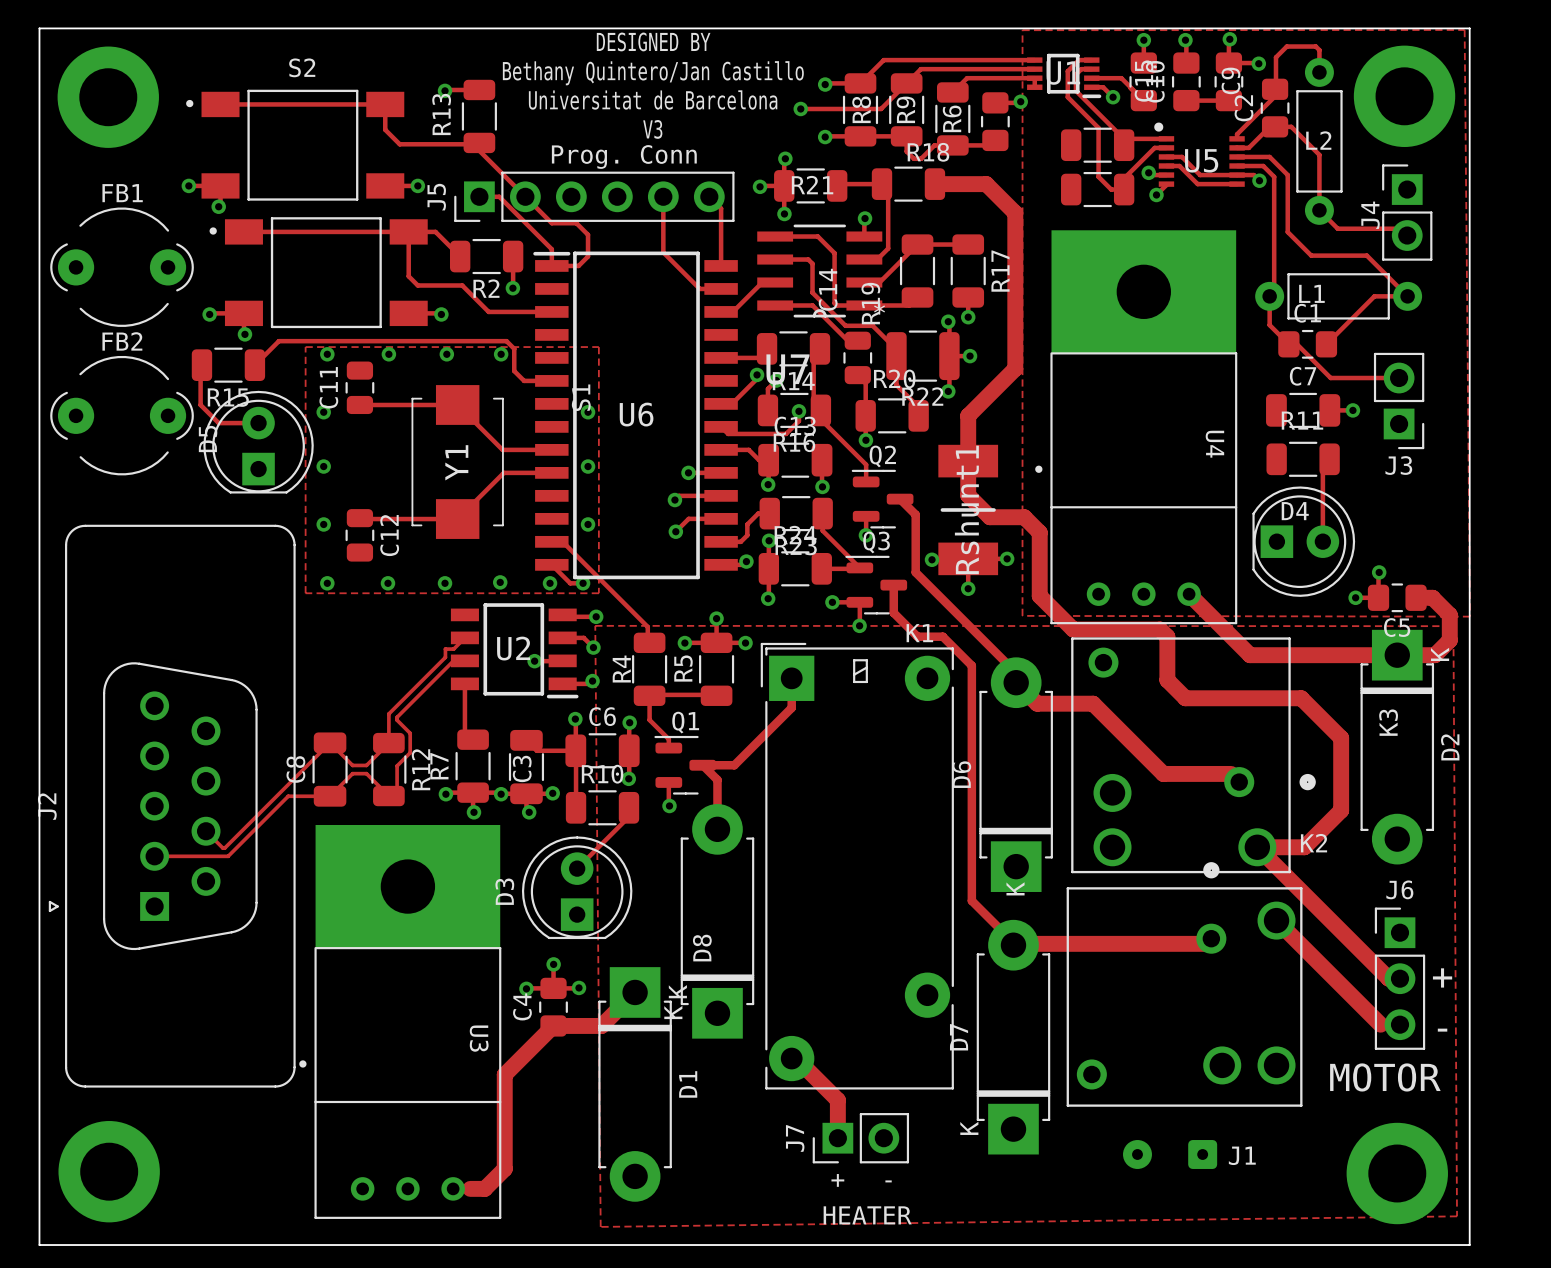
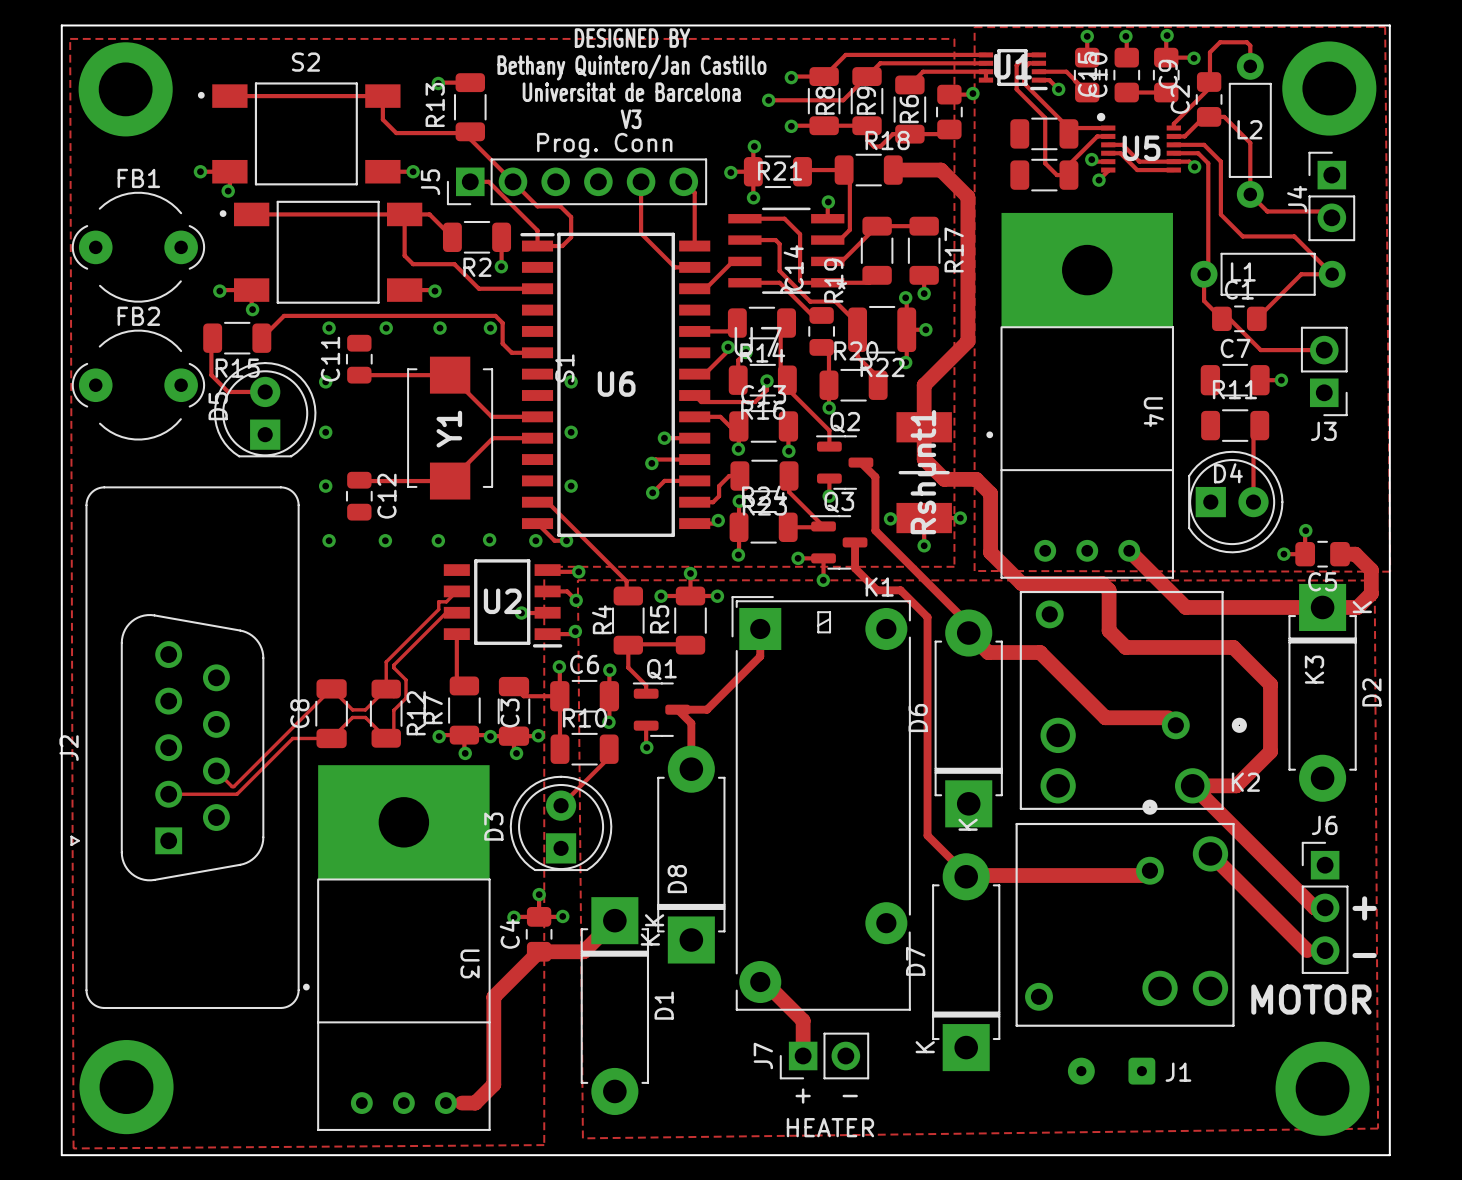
zone outline: none -> (70, 38) (73, 1148) (544, 1145) (544, 566) (954, 566) (954, 38) (70, 38)
zone outline: (305, 347) (305, 593) (598, 593) (598, 347) (305, 347) -> none

